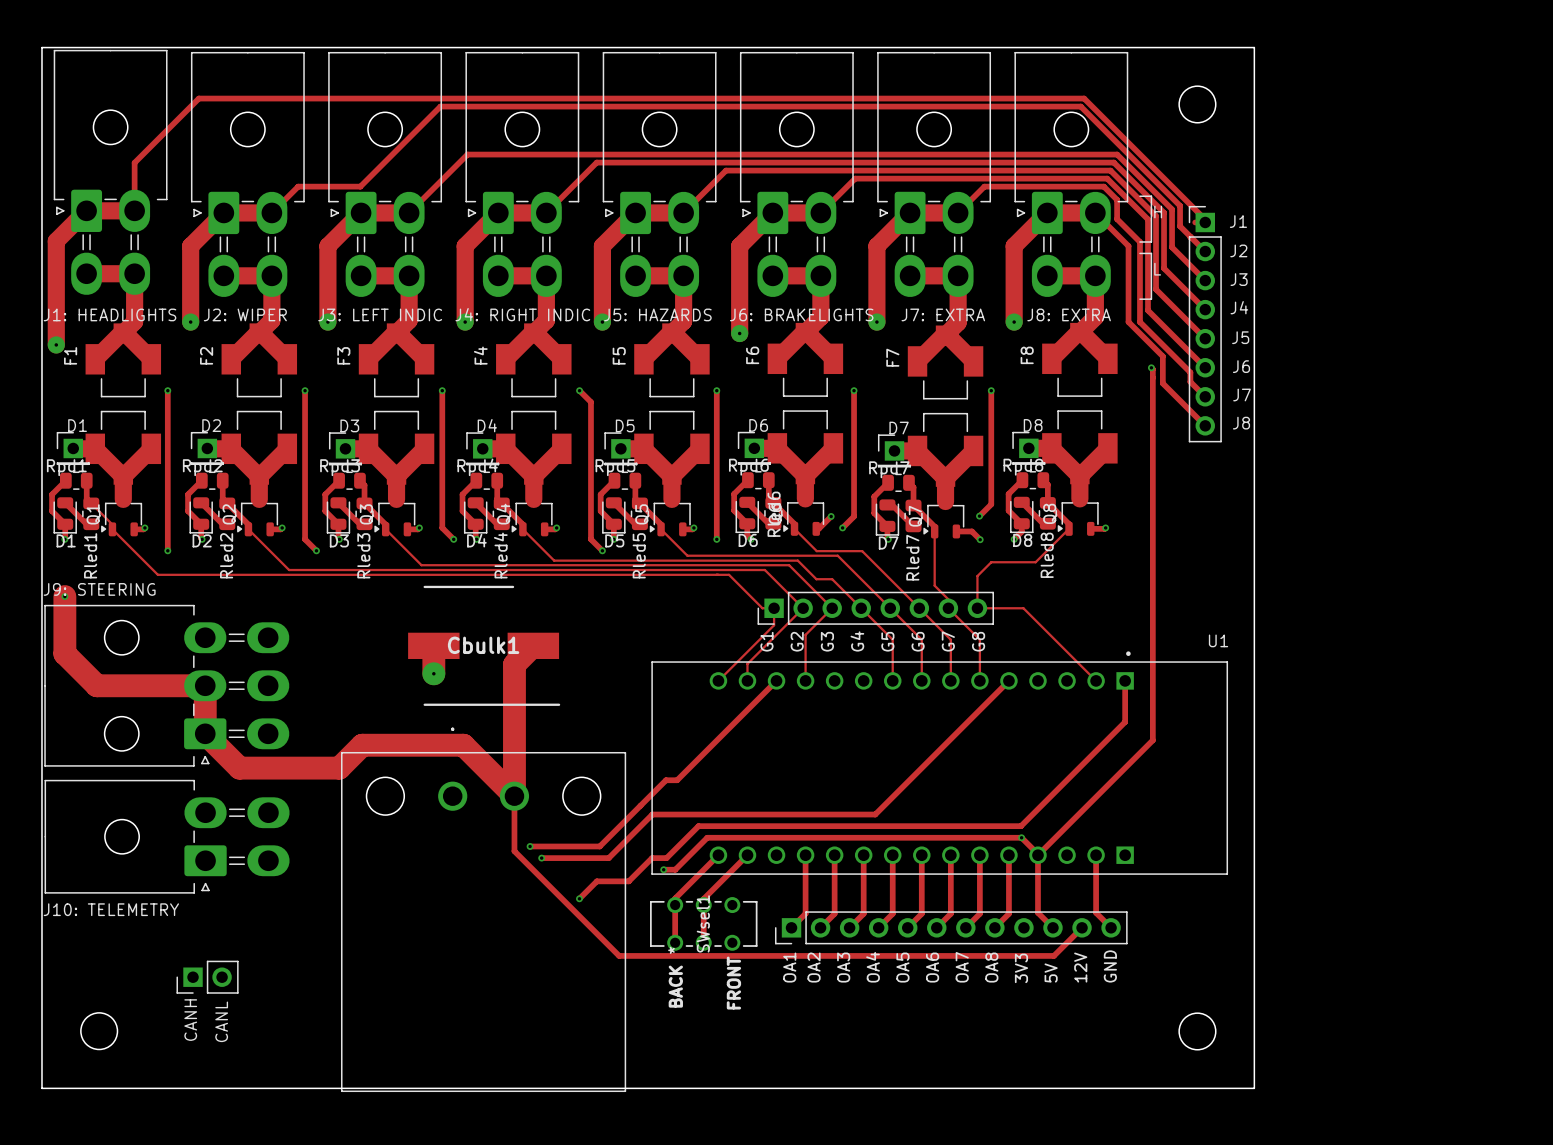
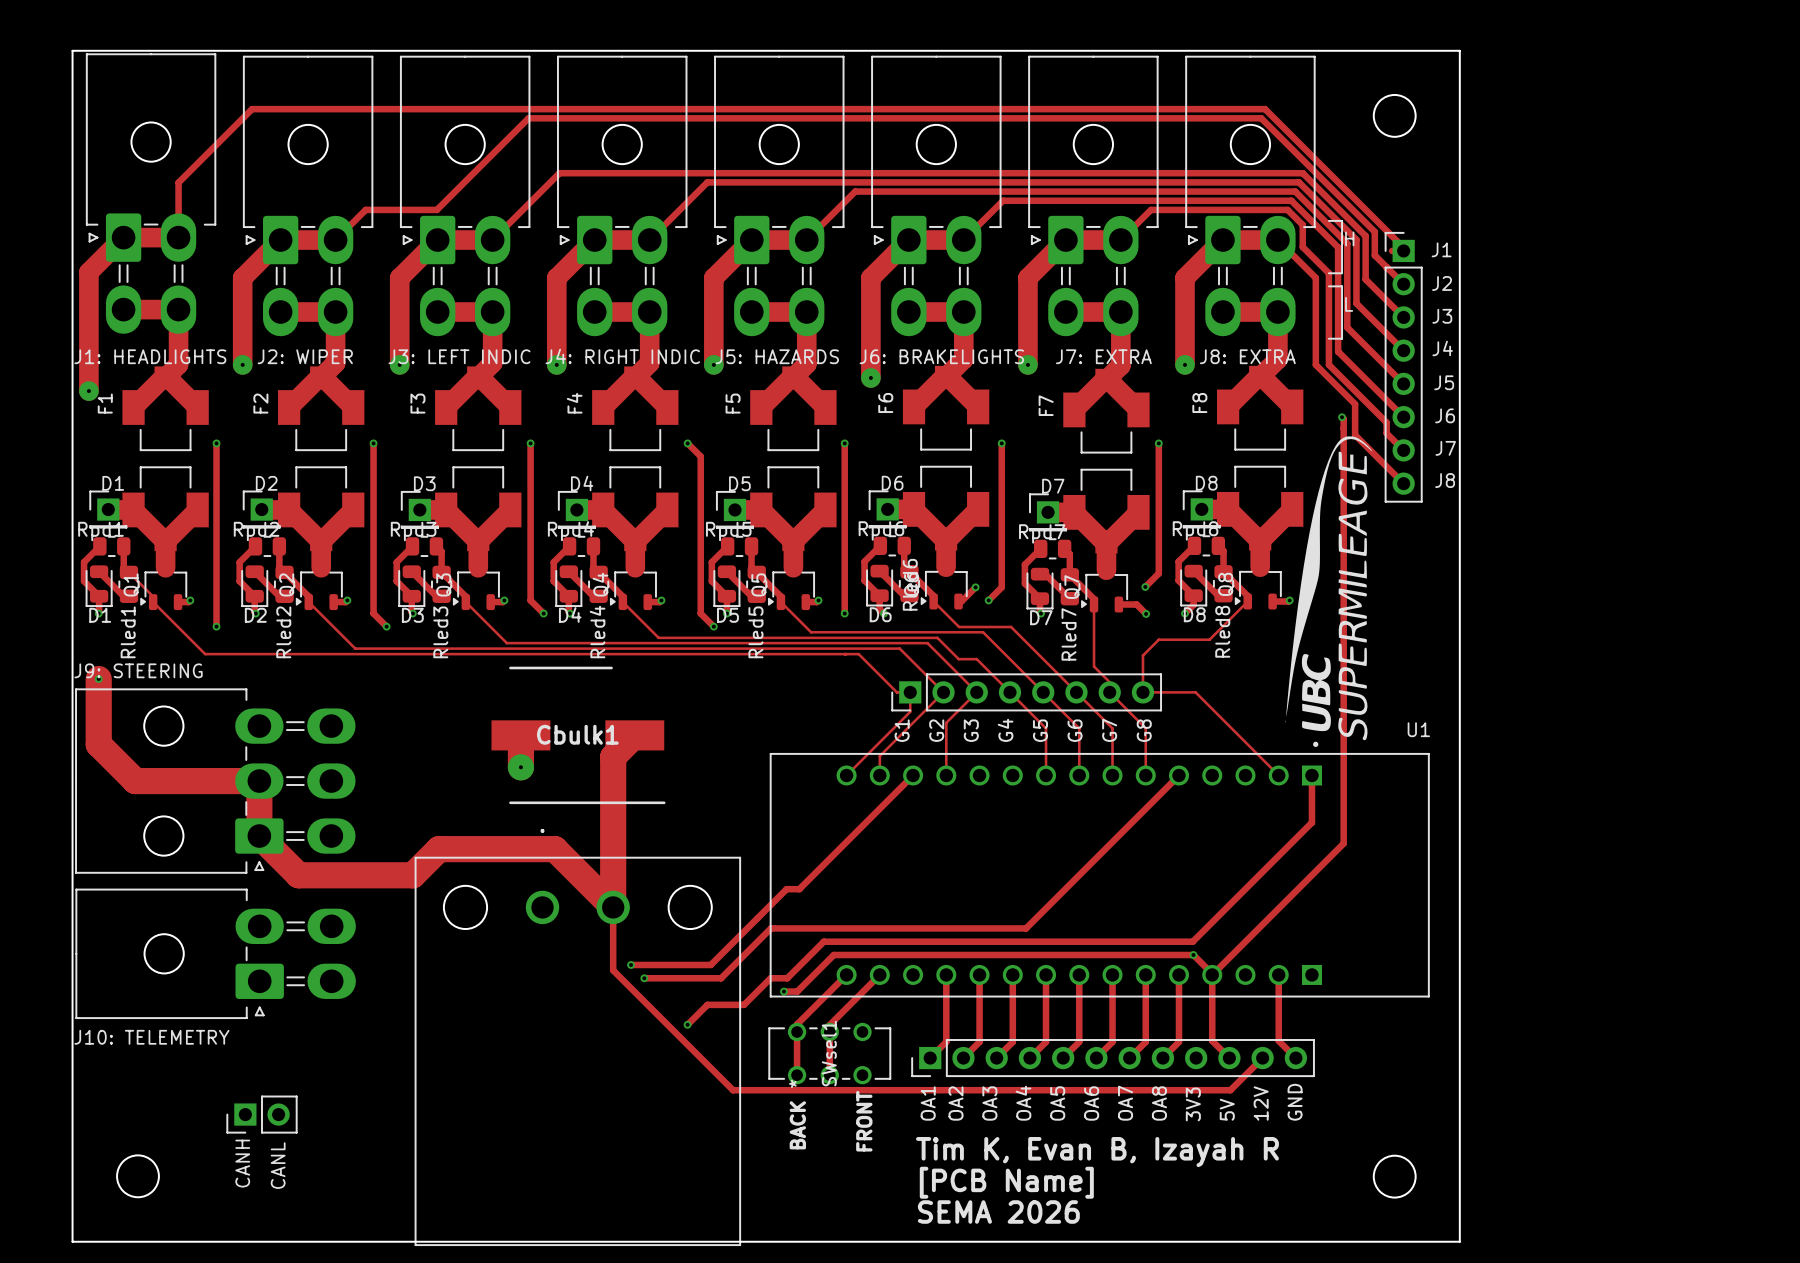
drawing: none -> [1285, 436, 1373, 741]
text: none -> Tim K, Evan B, Izayah R (1097, 1152)
text: none -> [PCB Name] (1006, 1182)
text: none -> SEMA 2026 (998, 1211)

